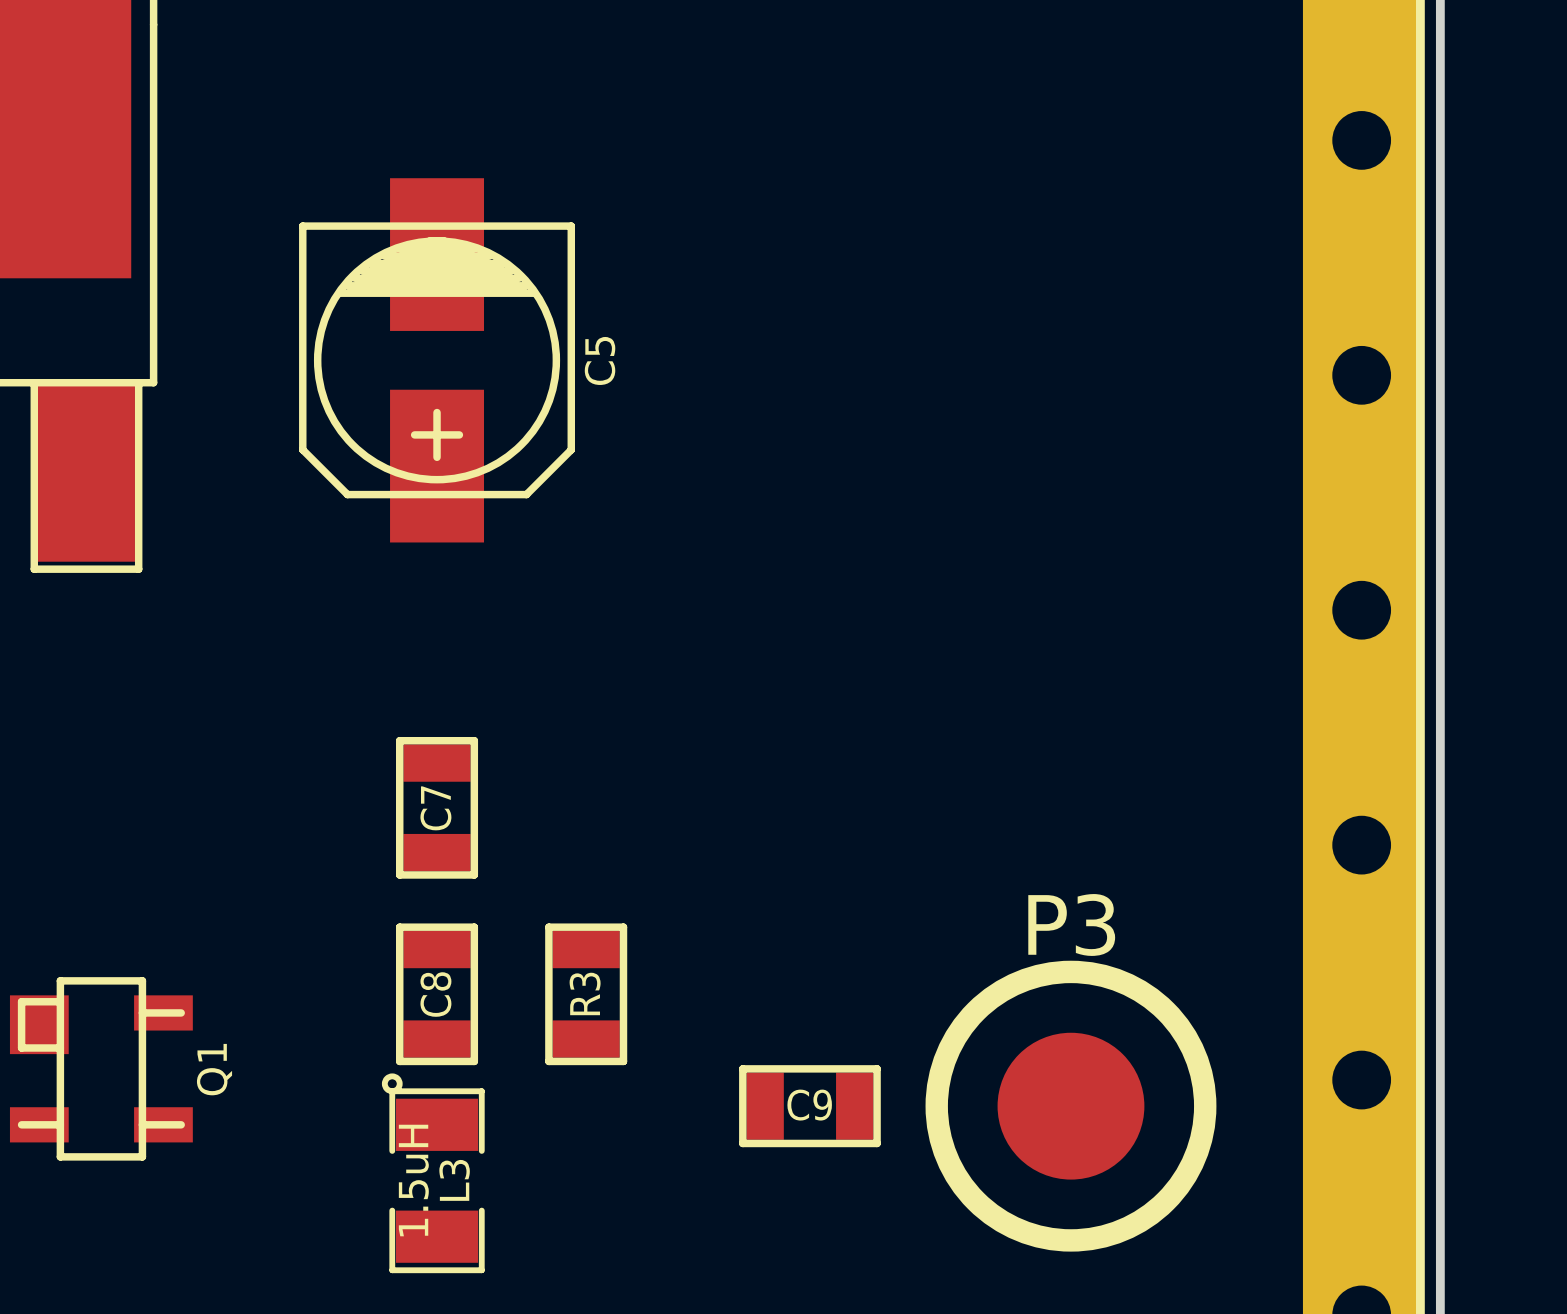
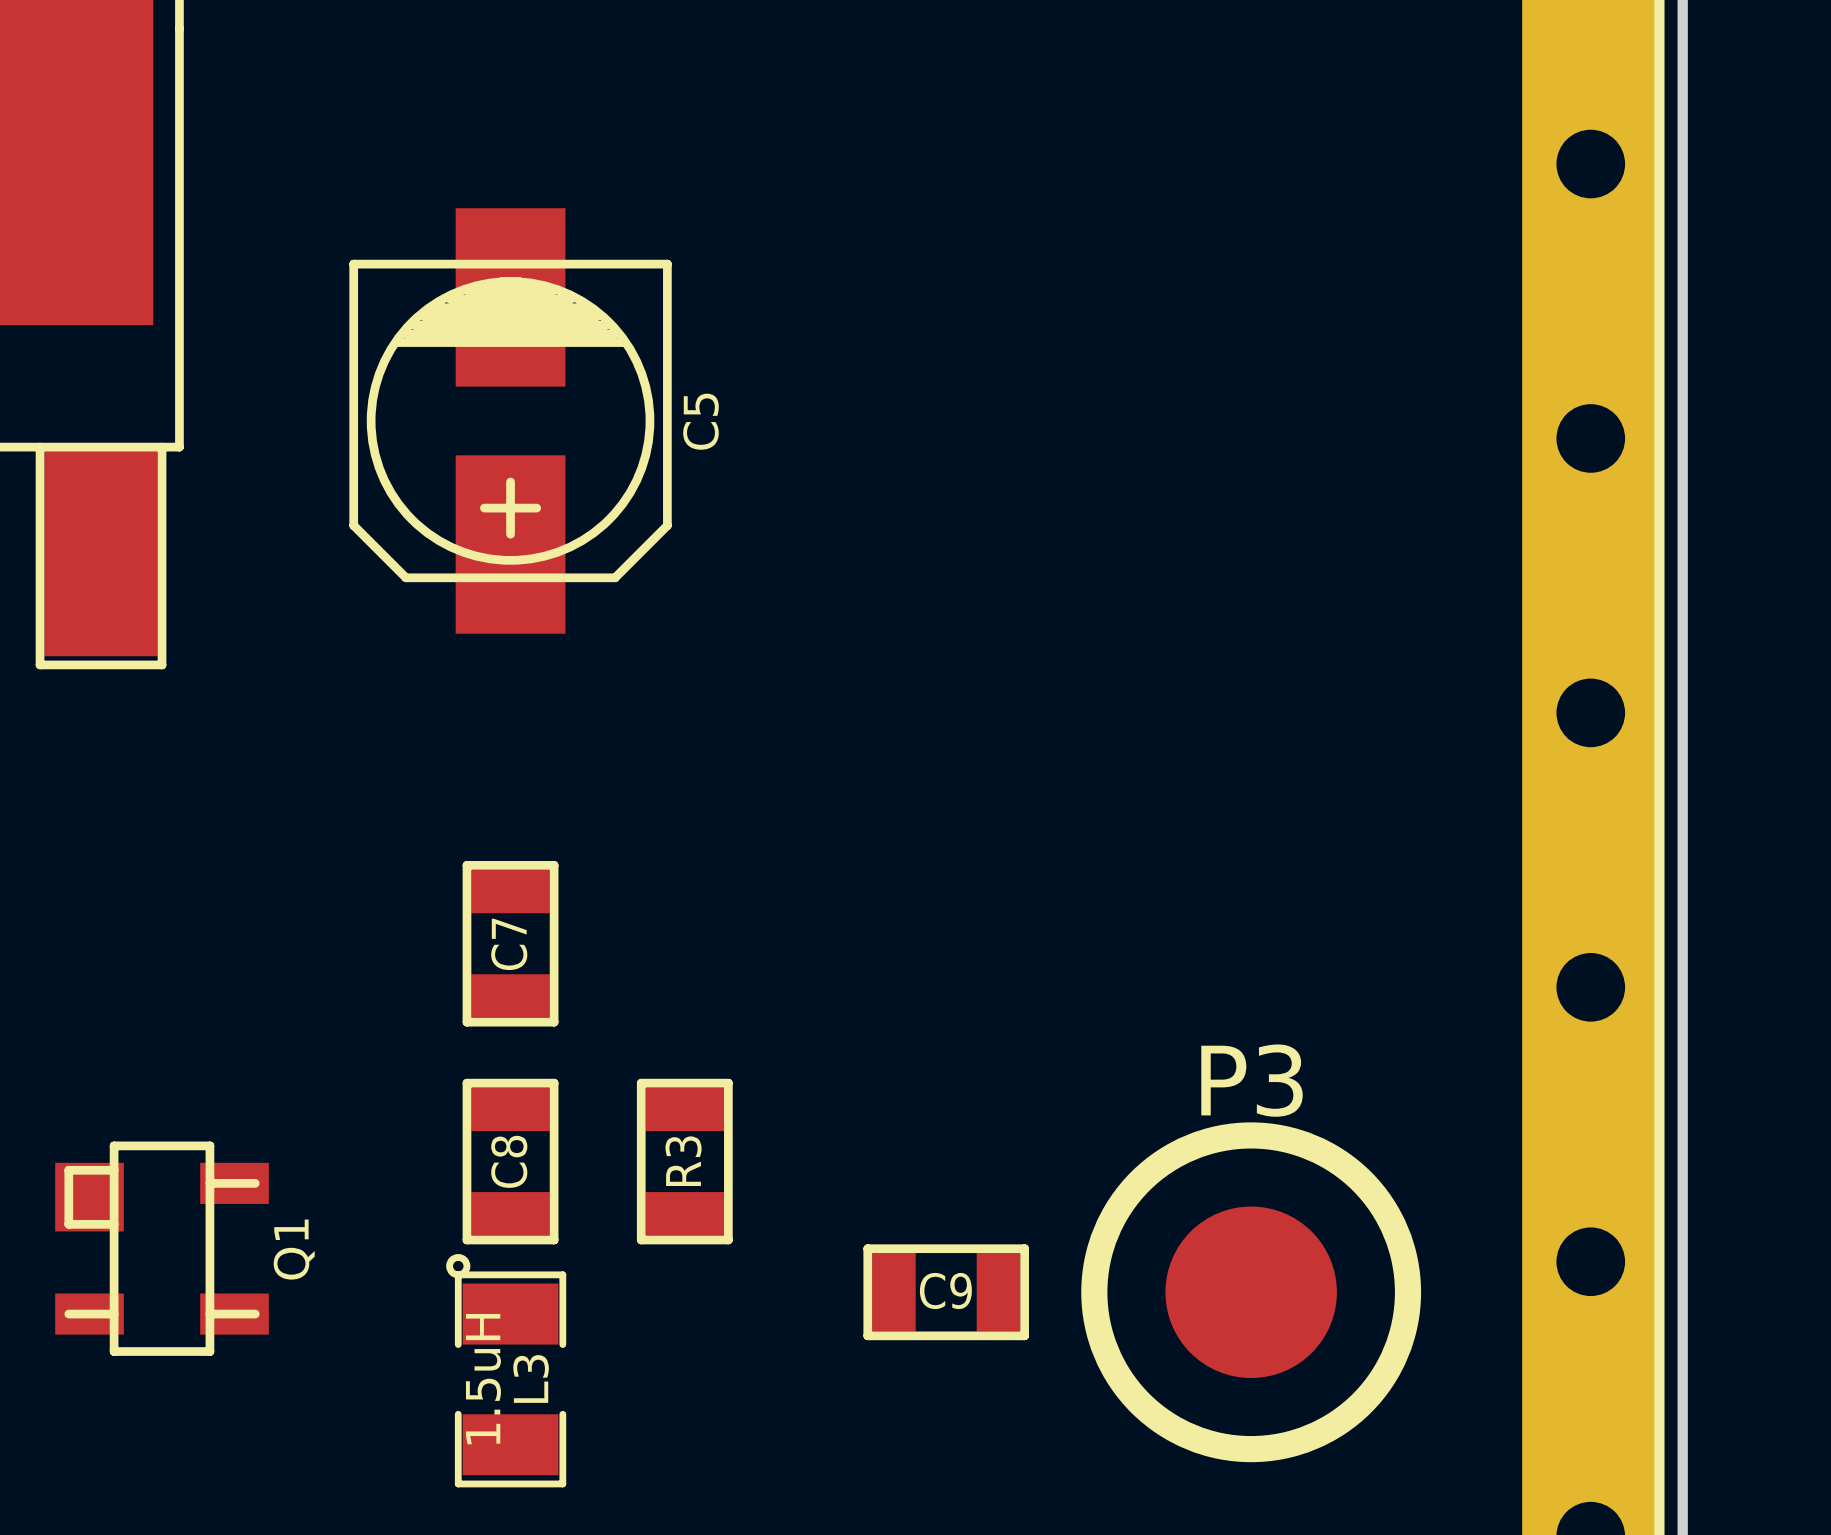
Q1 position: (101, 1068) -> (162, 1248)

